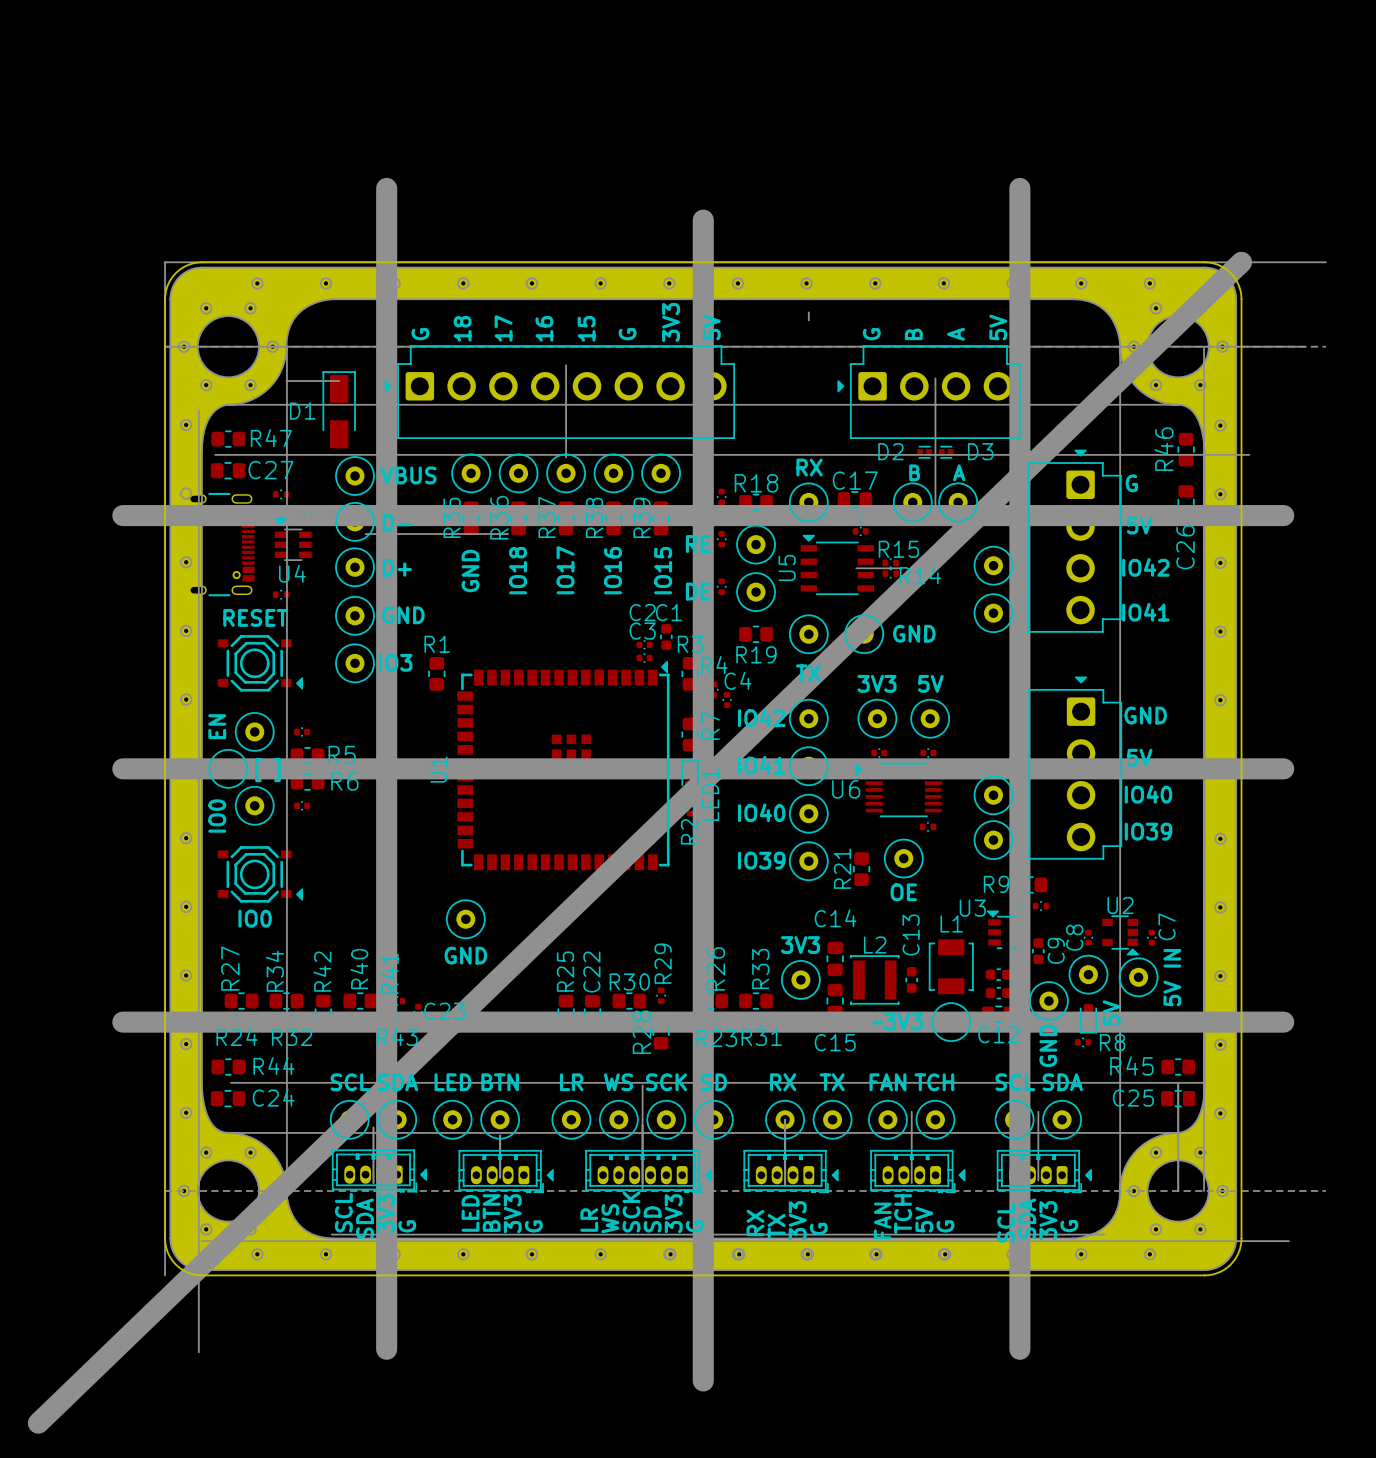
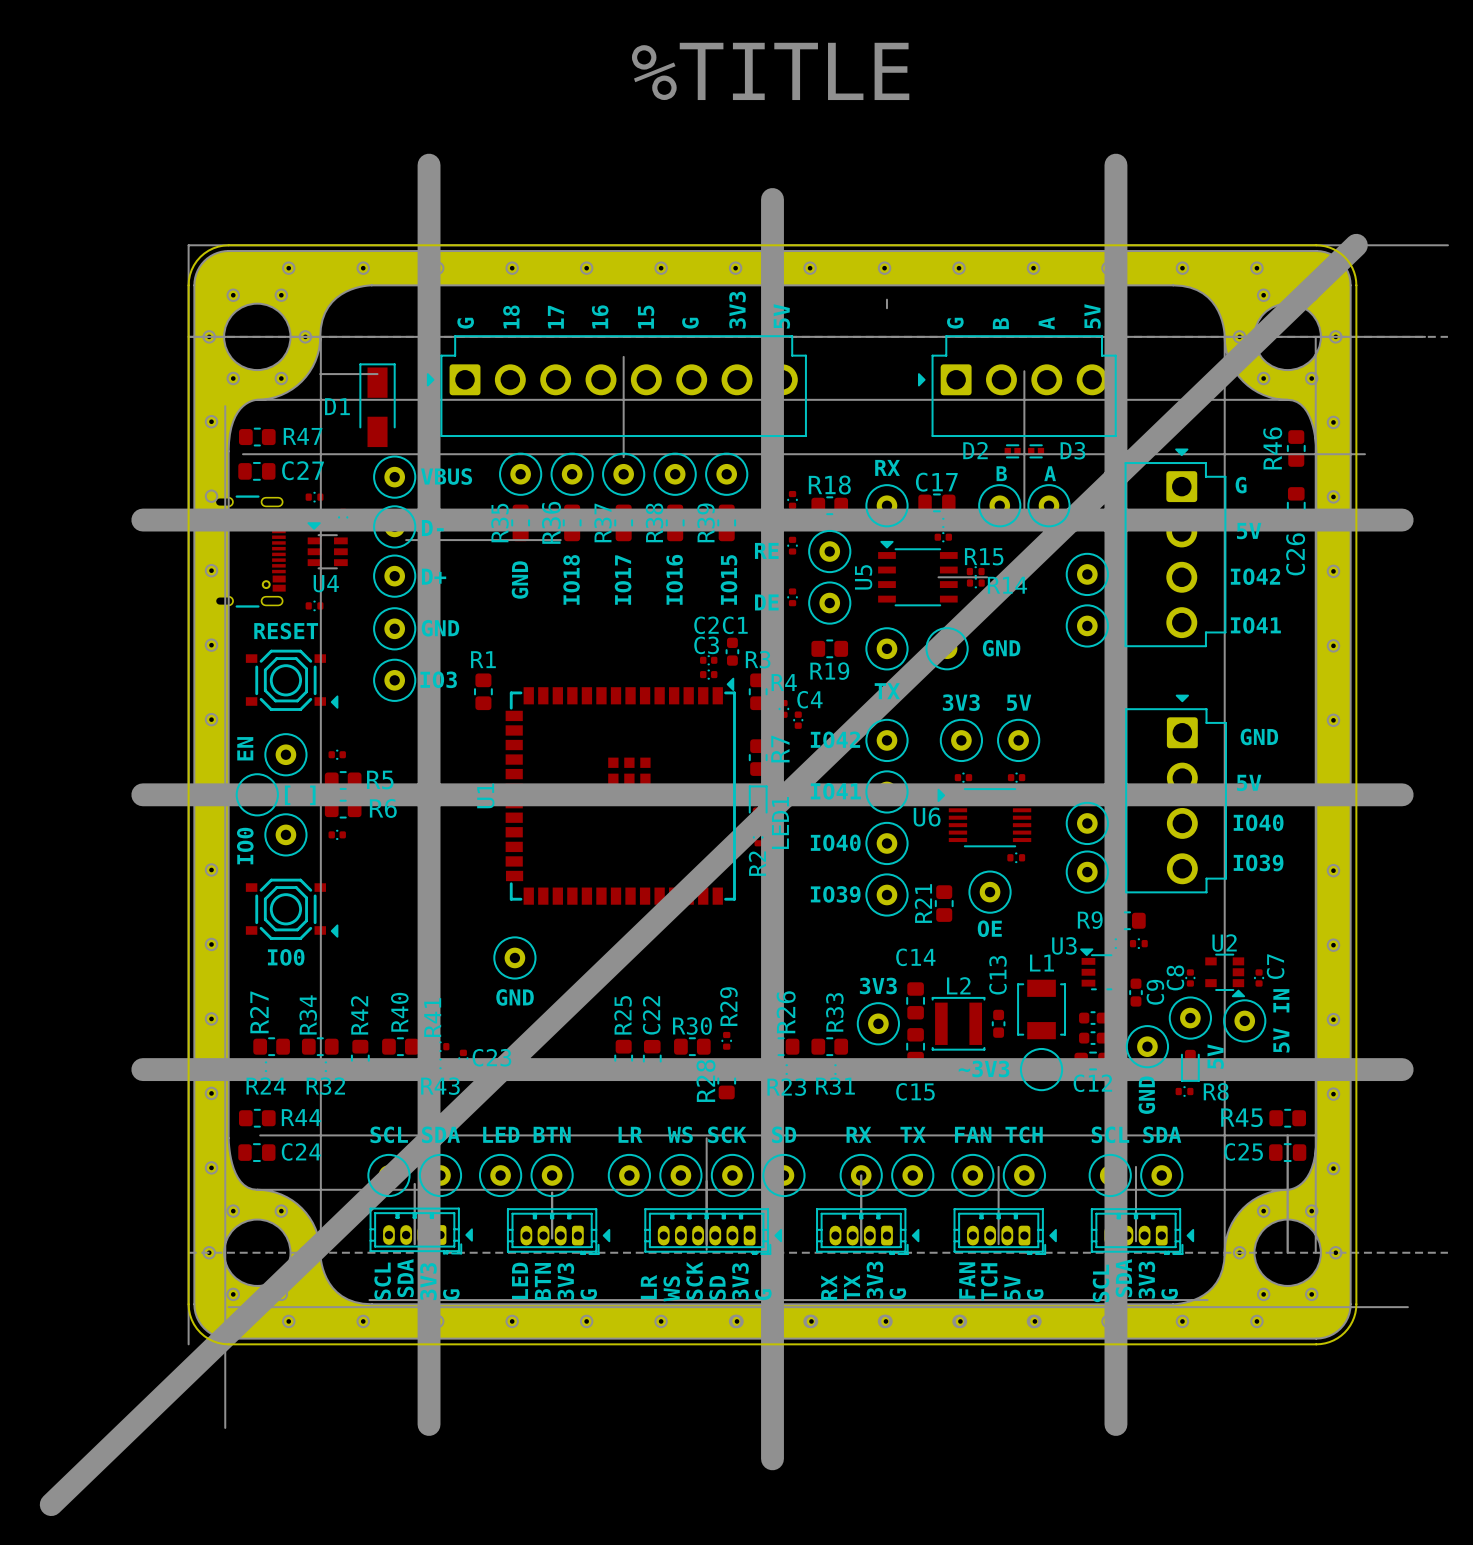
text: none -> %TITLE (770, 71)

